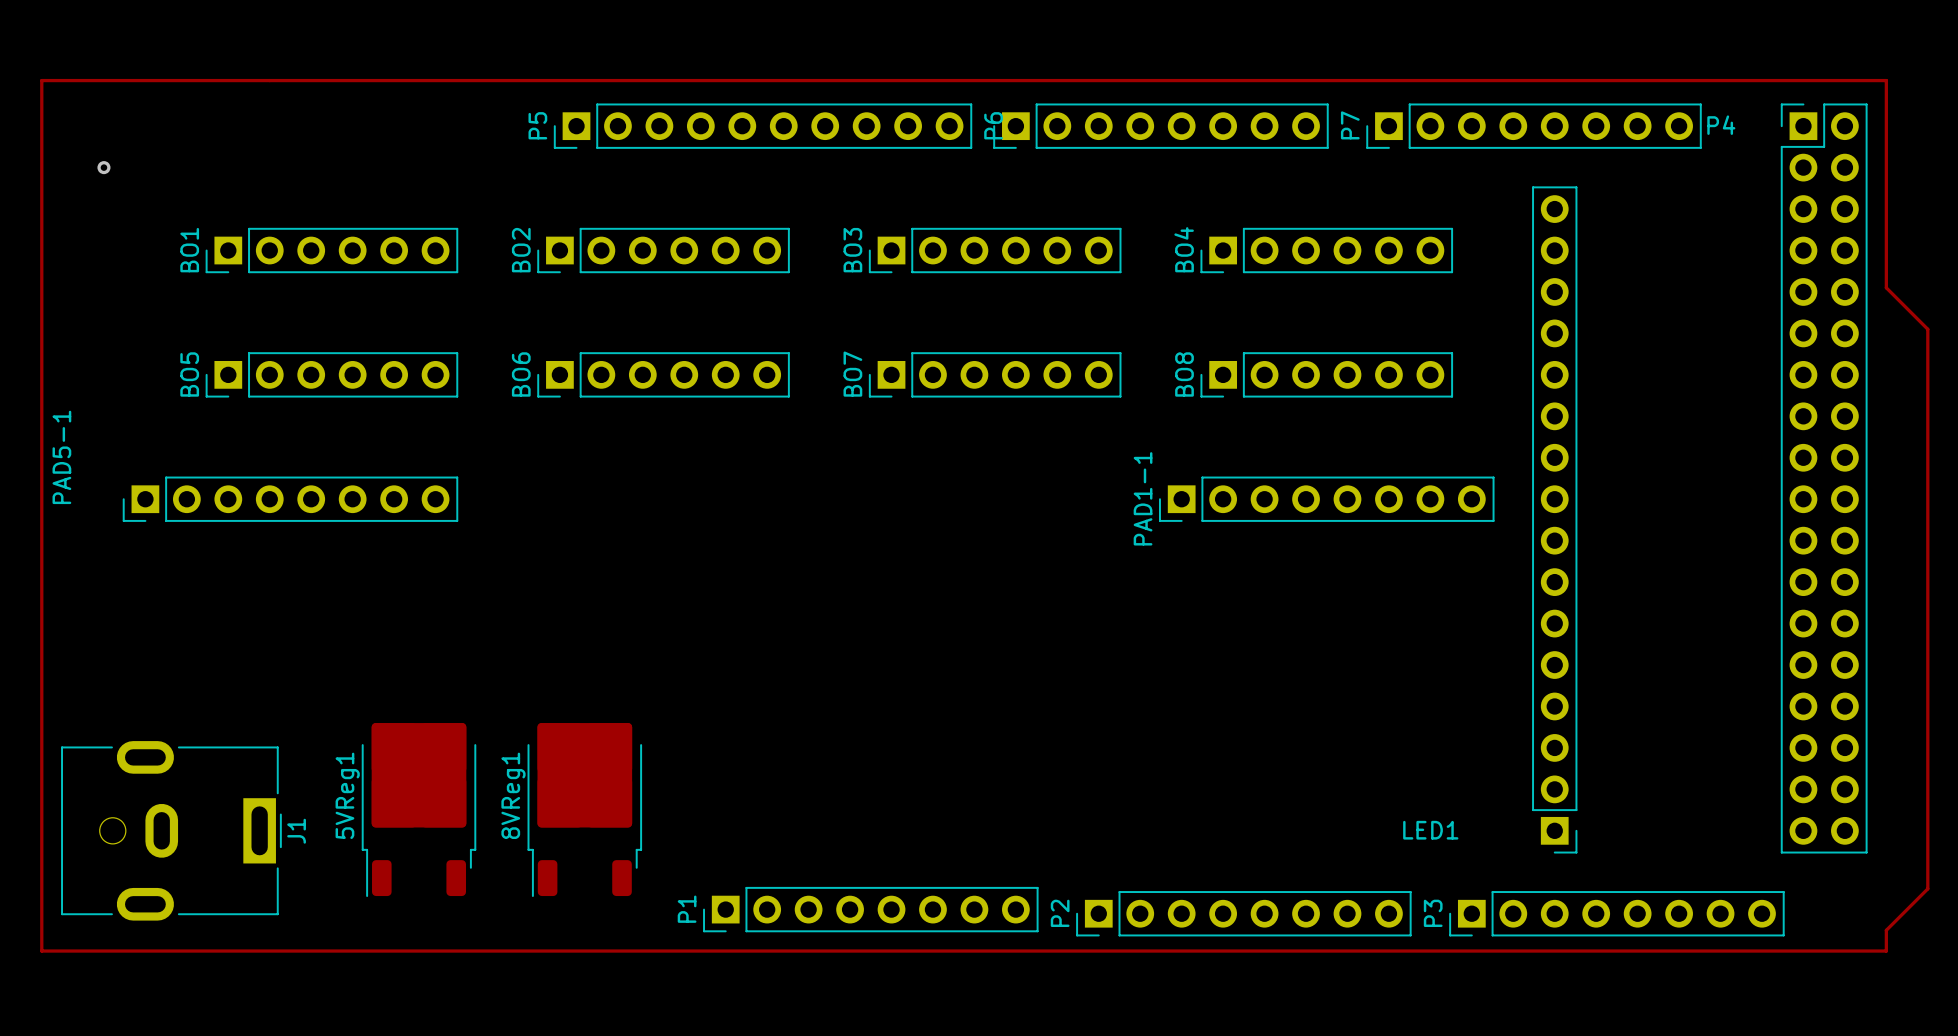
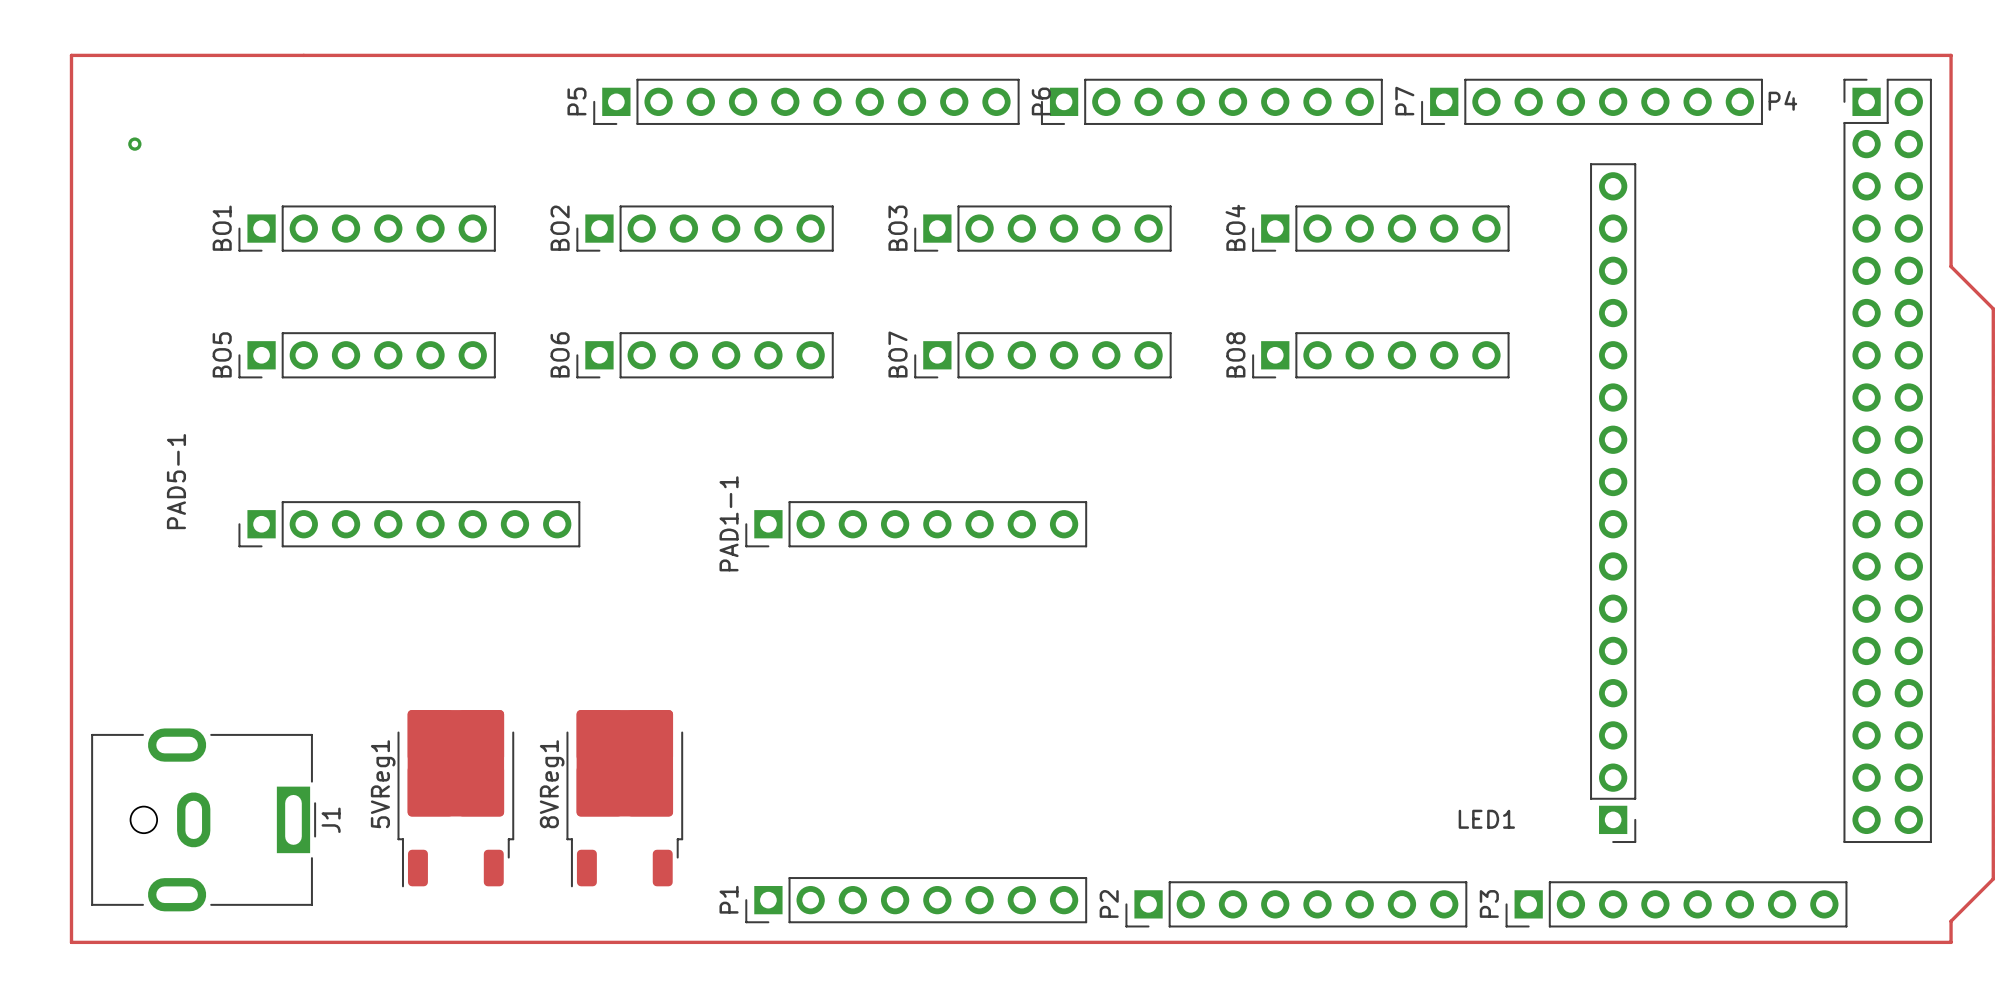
PAD5-1 position: (290, 499) -> (409, 524)
PAD1-1 position: (1326, 499) -> (916, 524)

